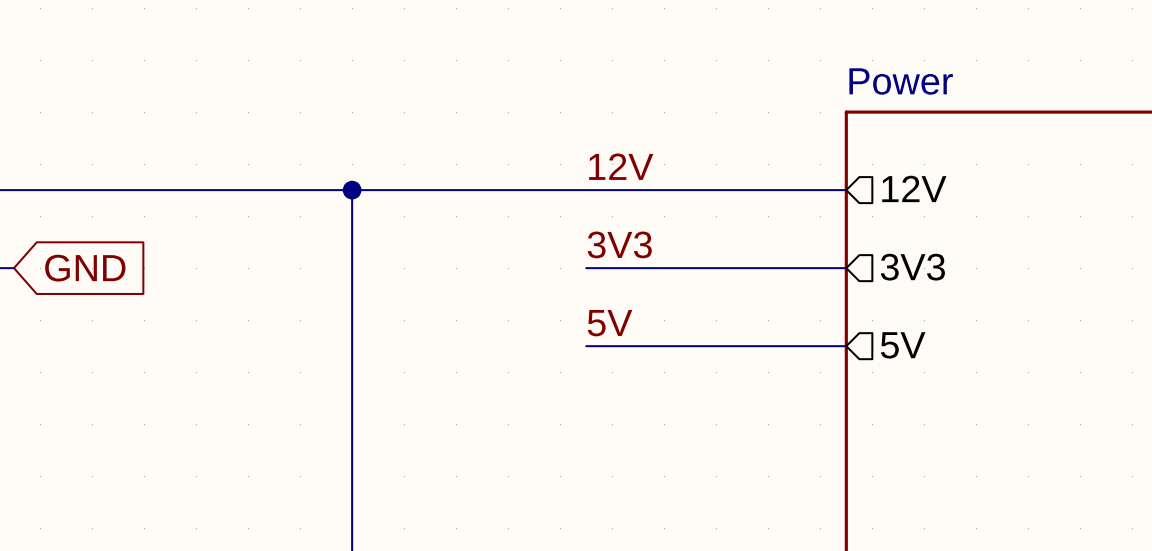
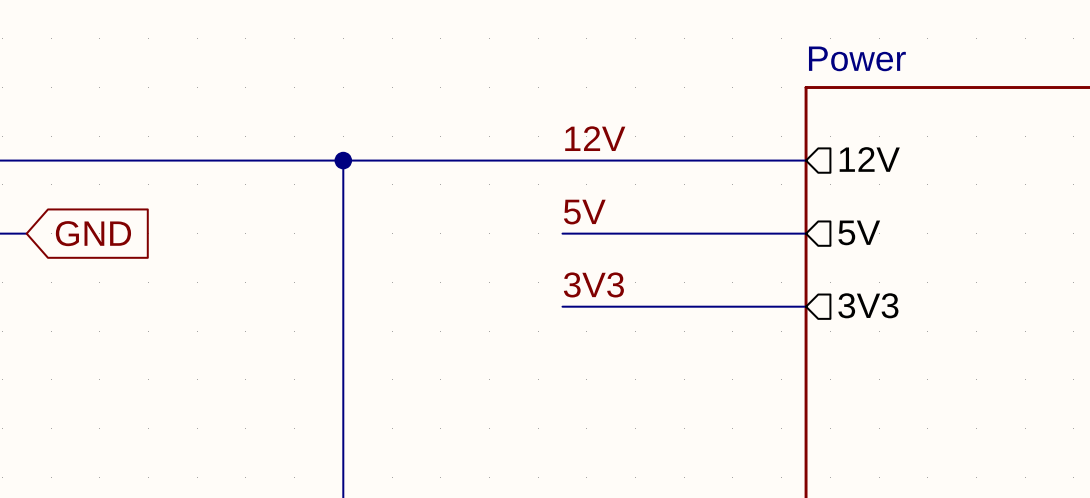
label: 3V3 (619, 244) -> 5V (584, 212)
sheet pin: 3V3 (912, 267) -> 5V (859, 232)
label: 5V (610, 323) -> 3V3 (593, 284)
sheet pin: 5V (903, 345) -> 3V3 (868, 305)

